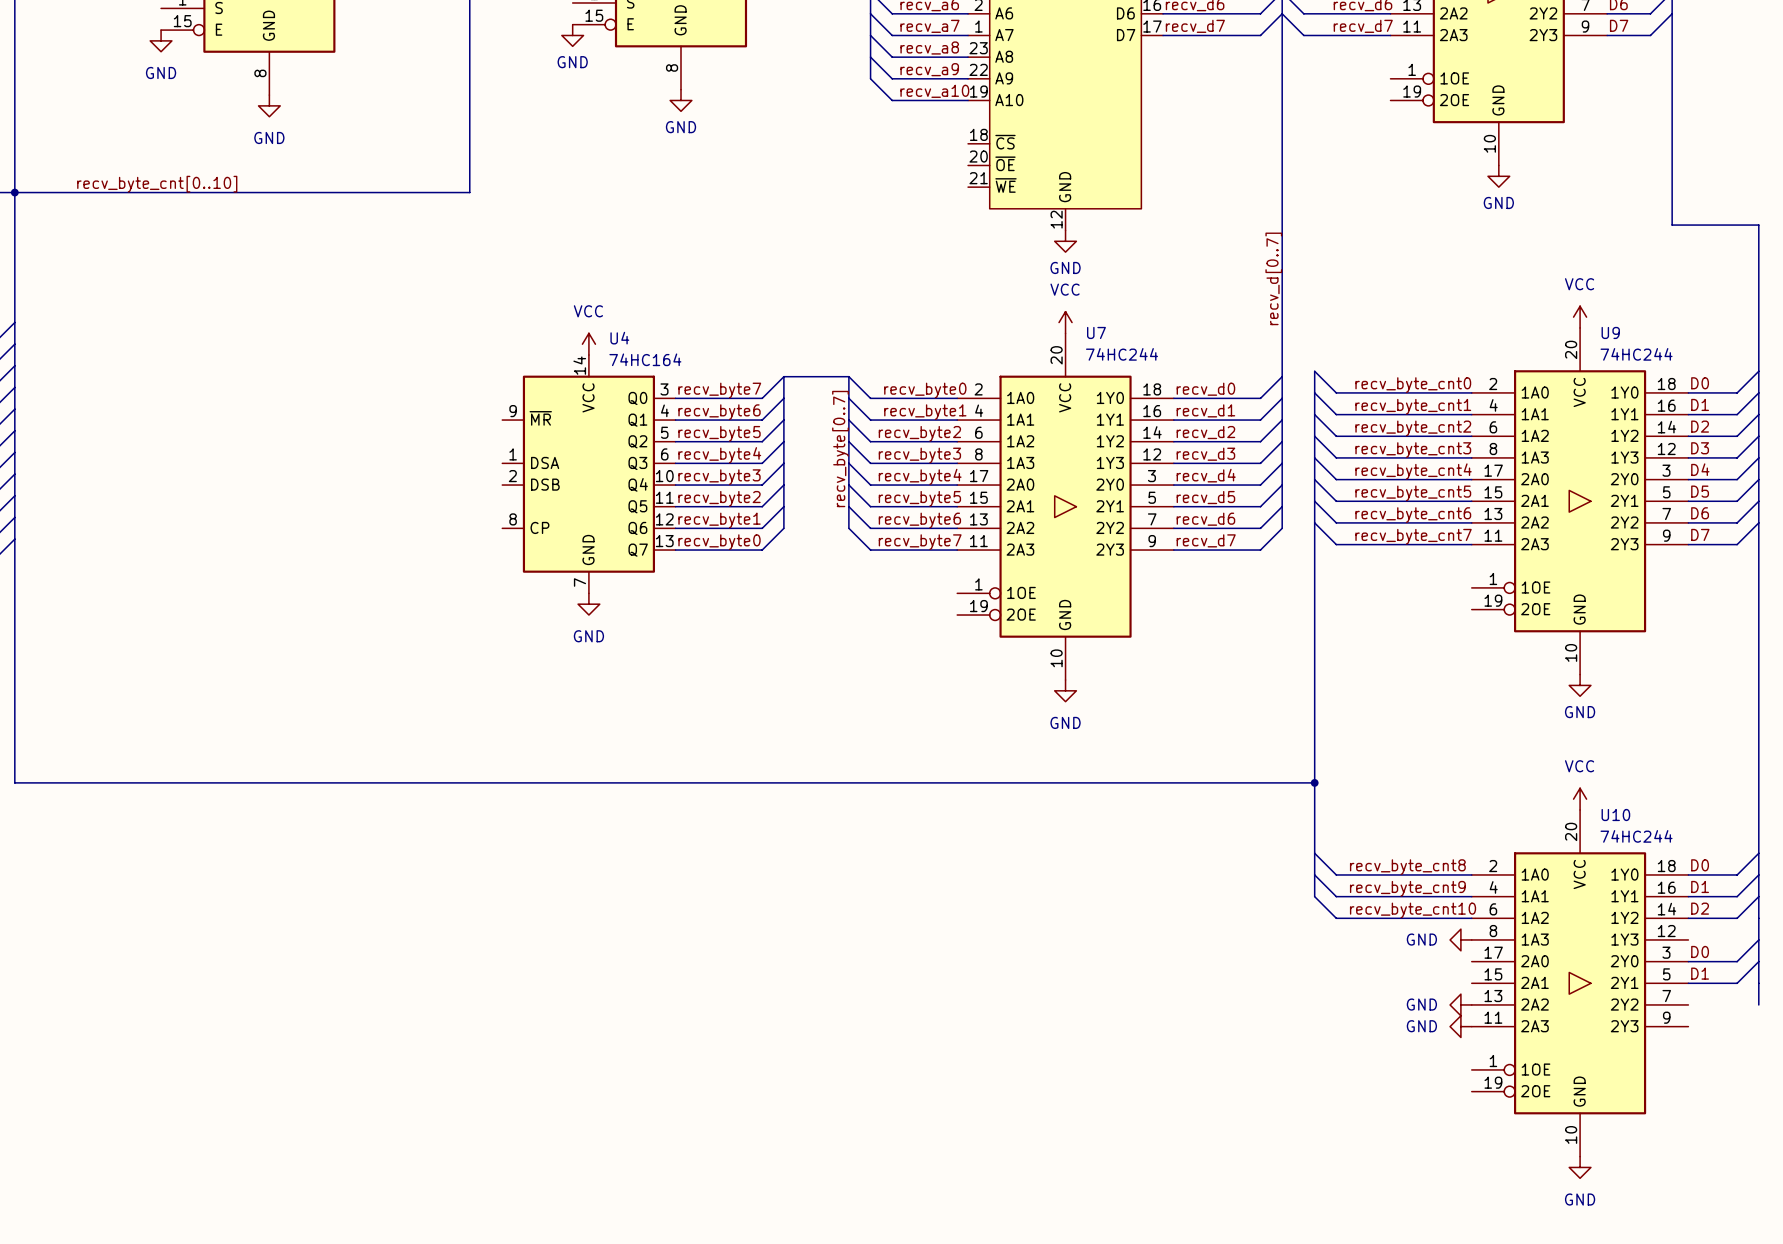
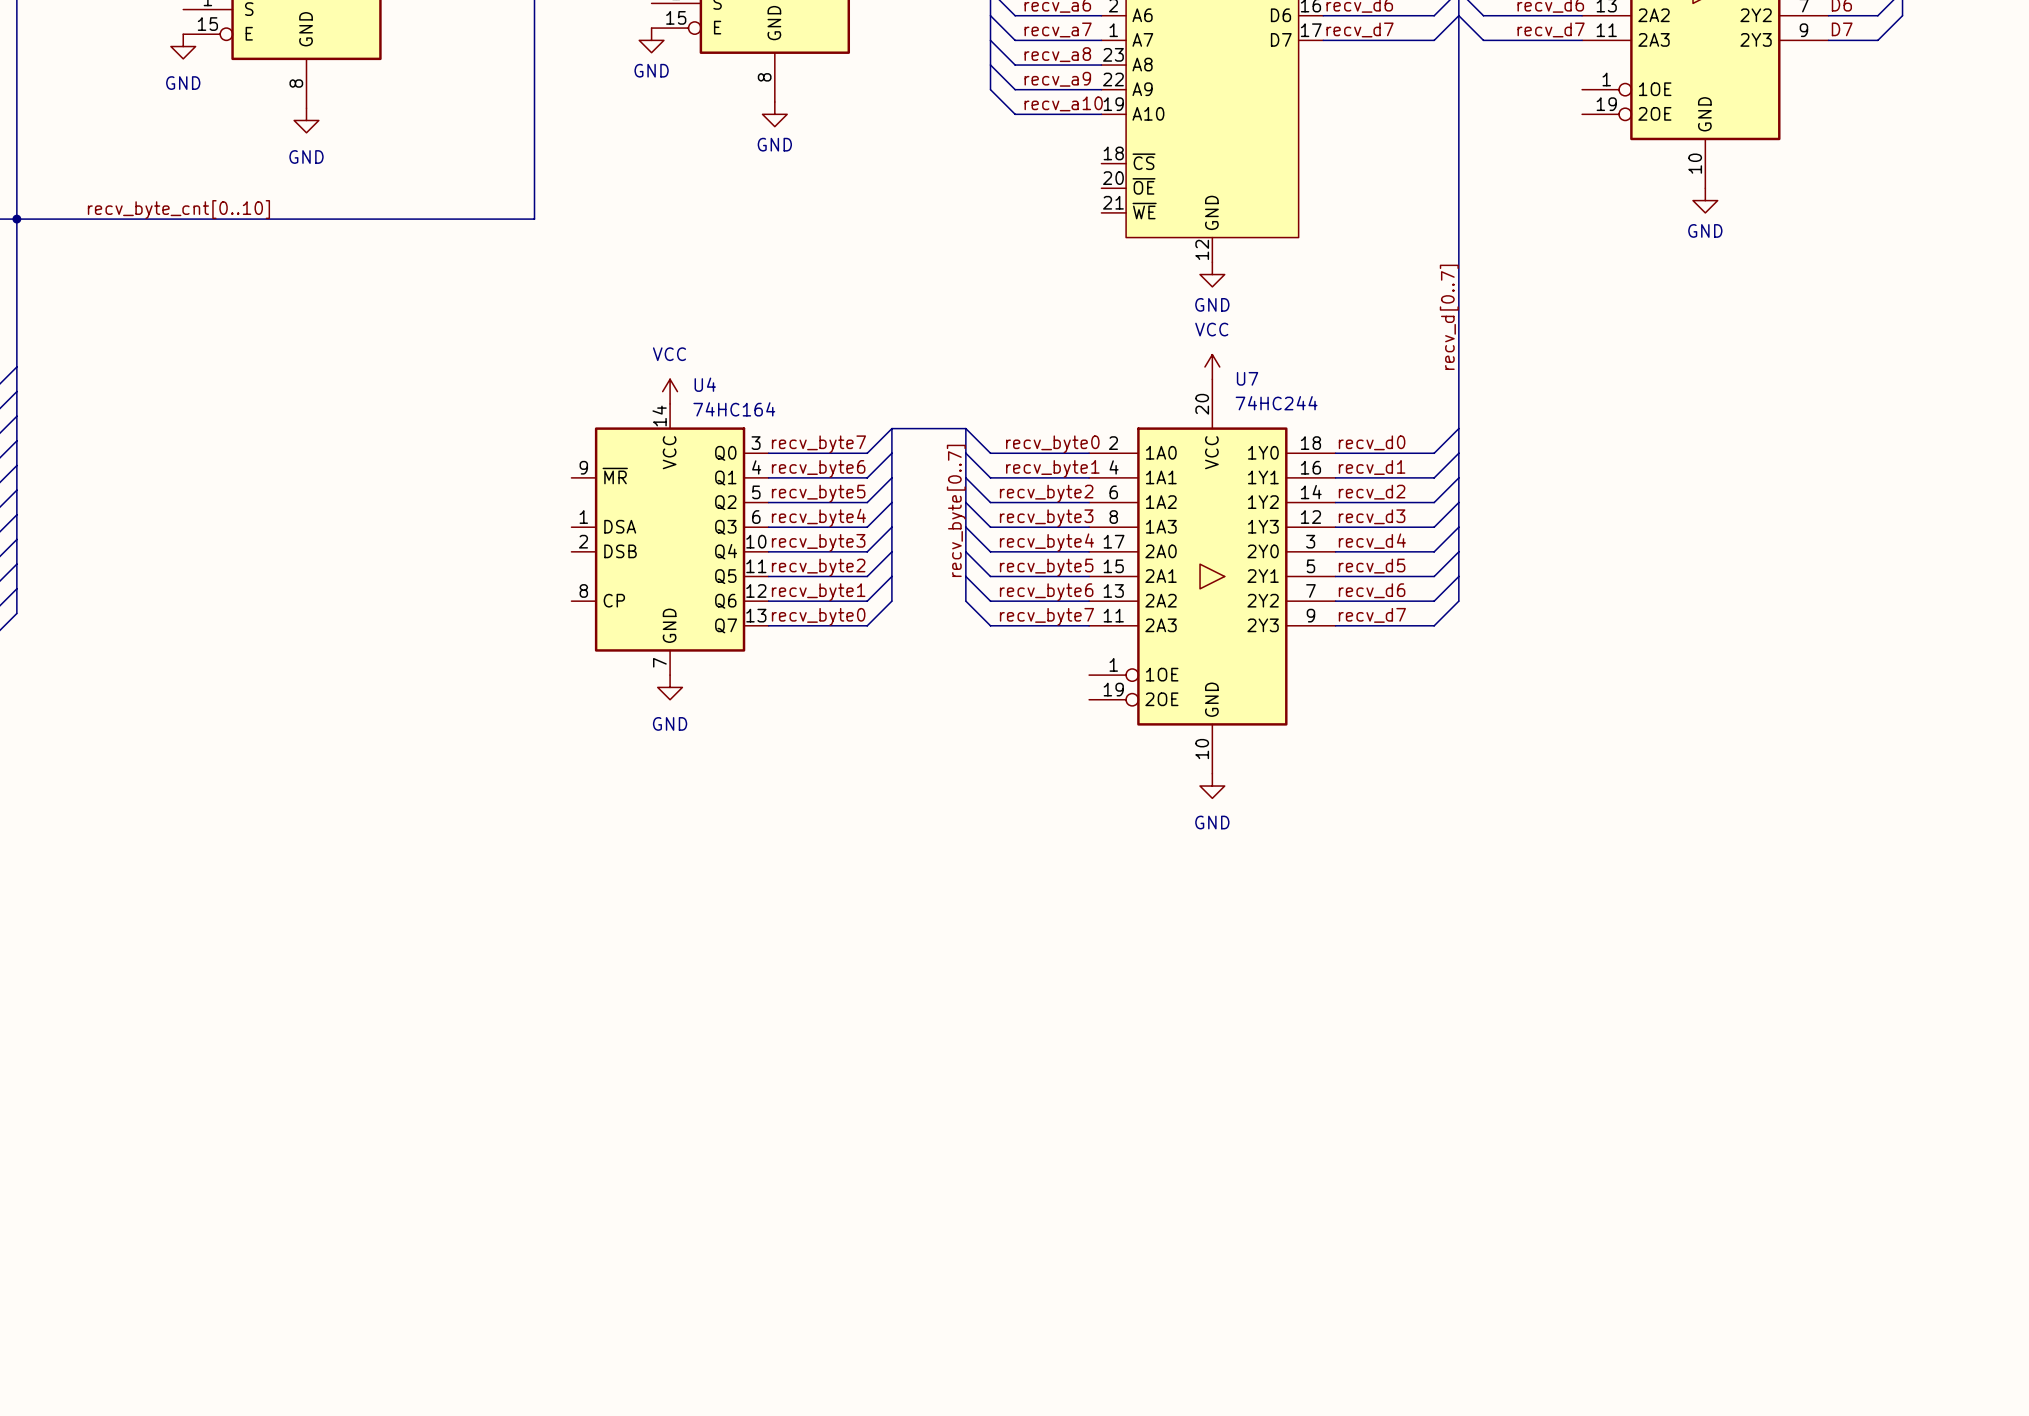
bus: (1672, 13) (1672, 225) (1758, 225) (1758, 1004) -> none
power symbol: VCC (1580, 317) -> none
wire: (1314, 371) (1336, 392) -> none
bus: (1314, 371) (1314, 896) -> none
wire: (1758, 371) (1737, 392) -> none
label: D0 (1700, 383) -> none
label: recv_byte_cnt0 (1413, 385) -> none
wire: (1314, 392) (1336, 414) (1471, 414) -> none
wire: (1336, 392) (1471, 392) -> none
wire: (1688, 392) (1737, 392) -> none
wire: (1758, 392) (1737, 414) (1688, 414) -> none
label: D1 (1700, 404) -> none
label: recv_byte_cnt1 (1413, 406) -> none
wire: (1314, 414) (1336, 436) -> none
wire: (1758, 414) (1737, 436) -> none
label: D2 (1700, 426) -> none
label: recv_byte_cnt2 (1413, 428) -> none
wire: (1314, 436) (1336, 457) (1471, 457) -> none
wire: (1336, 436) (1471, 436) -> none
wire: (1688, 436) (1737, 436) -> none
wire: (1758, 436) (1737, 457) (1688, 457) -> none
label: D3 (1700, 448) -> none
label: recv_byte_cnt3 (1413, 450) -> none
wire: (1314, 457) (1336, 479) (1471, 479) -> none
wire: (1758, 457) (1737, 479) (1688, 479) -> none
label: D4 (1700, 469) -> none
label: recv_byte_cnt4 (1413, 471) -> none
wire: (1314, 479) (1336, 501) -> none
wire: (1758, 479) (1737, 501) -> none
label: D5 (1700, 491) -> none
label: recv_byte_cnt5 (1413, 493) -> none
wire: (1314, 501) (1336, 522) (1471, 522) -> none
wire: (1336, 501) (1471, 501) -> none
U9: 74HC244 (1580, 501) -> none
wire: (1688, 501) (1737, 501) -> none
wire: (1758, 501) (1737, 522) (1688, 522) -> none
label: D6 (1700, 513) -> none
label: recv_byte_cnt6 (1413, 515) -> none
wire: (1314, 522) (1336, 544) (1471, 544) -> none
wire: (1758, 522) (1737, 544) (1688, 544) -> none
label: D7 (1700, 534) -> none
label: recv_byte_cnt7 (1413, 536) -> none
bus: (14, 539) (14, 782) (1314, 782) -> none
power symbol: GND (1580, 685) -> none
junction: (1314, 782) -> none
power symbol: VCC (1580, 799) -> none
wire: (1314, 853) (1336, 874) (1471, 874) -> none
wire: (1758, 853) (1737, 874) (1688, 874) -> none
label: D0 (1700, 865) -> none
label: recv_byte_cnt8 (1407, 867) -> none
wire: (1314, 874) (1336, 896) (1471, 896) -> none
wire: (1758, 874) (1737, 896) (1688, 896) -> none
label: D1 (1700, 886) -> none
label: recv_byte_cnt9 (1407, 888) -> none
wire: (1314, 896) (1336, 918) (1471, 918) -> none
wire: (1758, 896) (1737, 918) (1688, 918) -> none
label: D2 (1700, 908) -> none
label: recv_byte_cnt10 (1413, 910) -> none
power symbol: GND (1460, 939) -> none
wire: (1758, 939) (1737, 961) (1688, 961) -> none
label: D0 (1700, 951) -> none
wire: (1758, 961) (1737, 983) (1688, 983) -> none
label: D1 (1700, 973) -> none
U10: 74HC244 (1580, 983) -> none
power symbol: GND (1460, 1004) -> none
power symbol: GND (1460, 1026) -> none
power symbol: GND (1580, 1167) -> none

